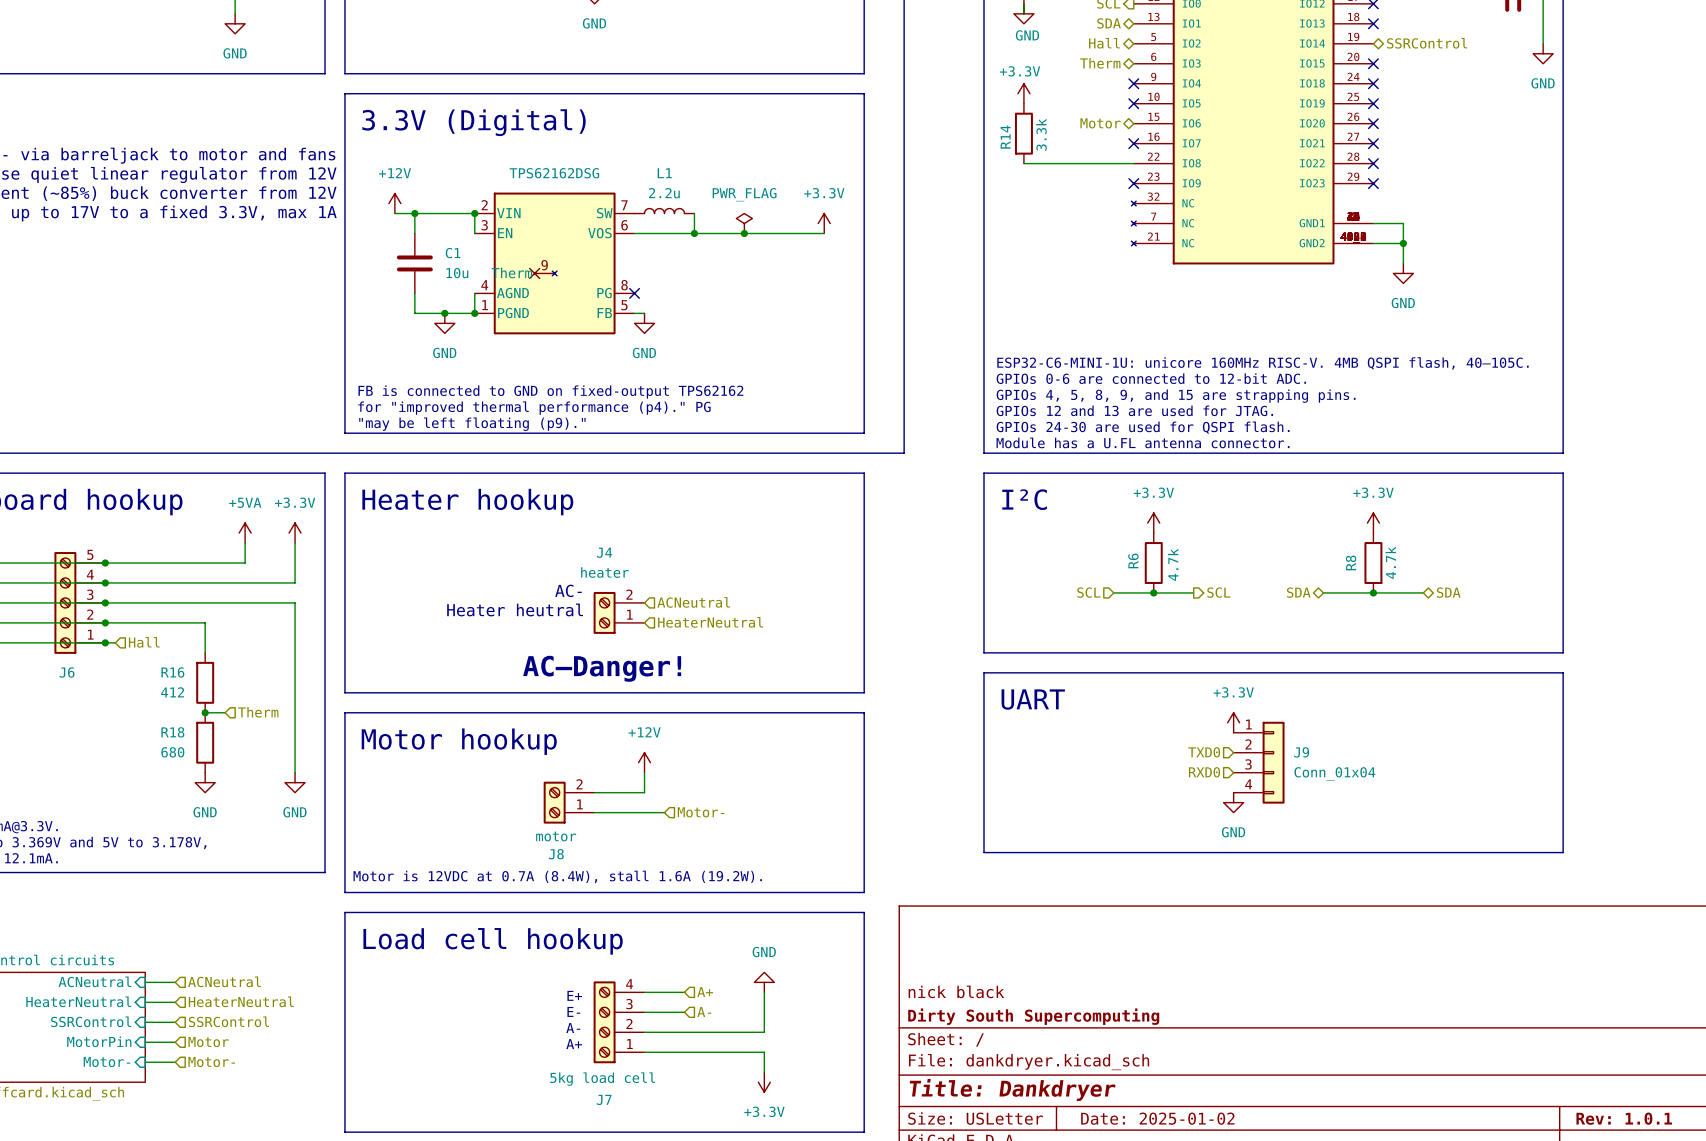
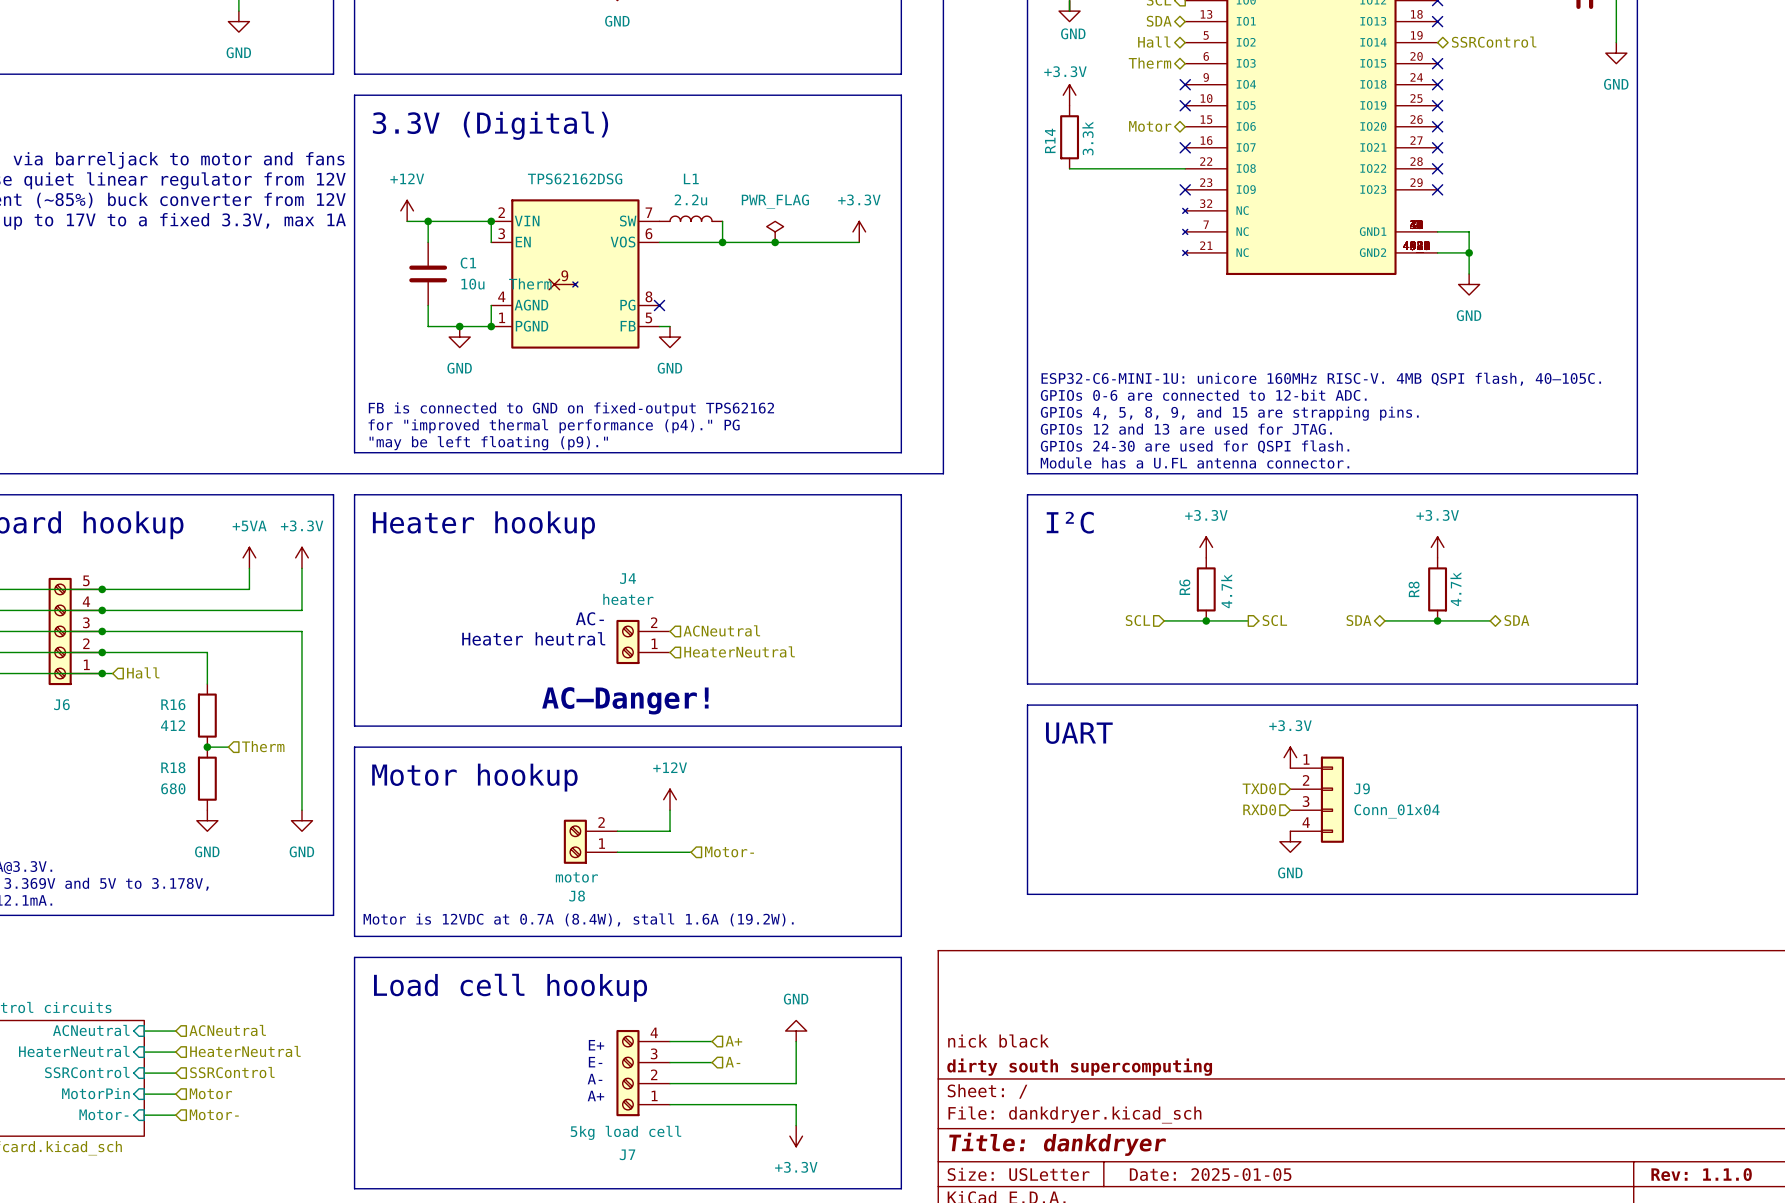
title block: Dirty South Supercomputing (1033, 1016) -> dirty south supercomputing (1079, 1067)
title block: Title: Dankdryer (1012, 1089) -> Title: dankdryer (1057, 1144)
title block: Date: 2025-01-02 (1157, 1118) -> Date: 2025-01-05 (1210, 1174)
title block: Rev: 1.0.1 (1624, 1118) -> Rev: 1.1.0 (1701, 1174)

